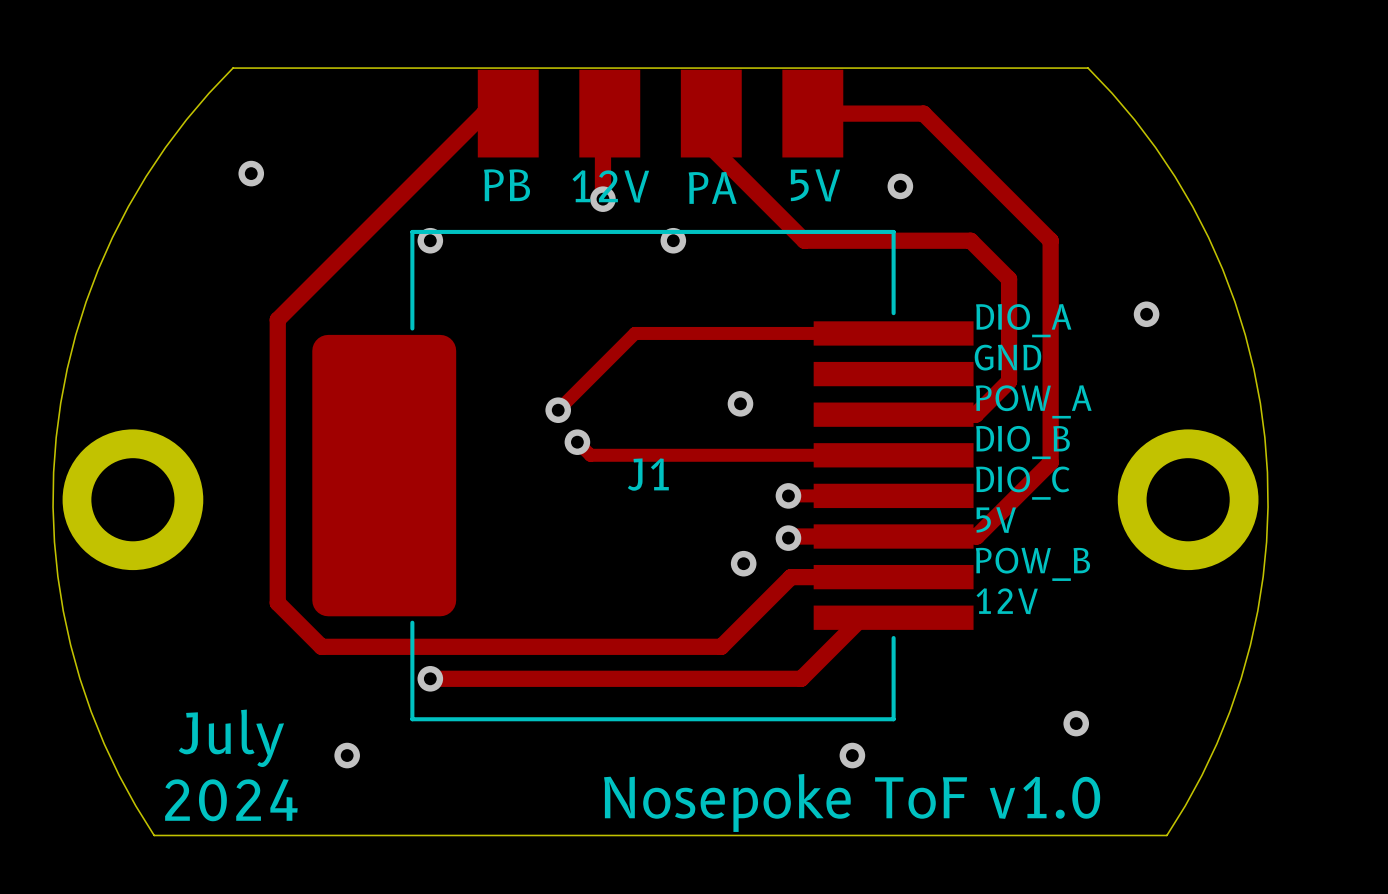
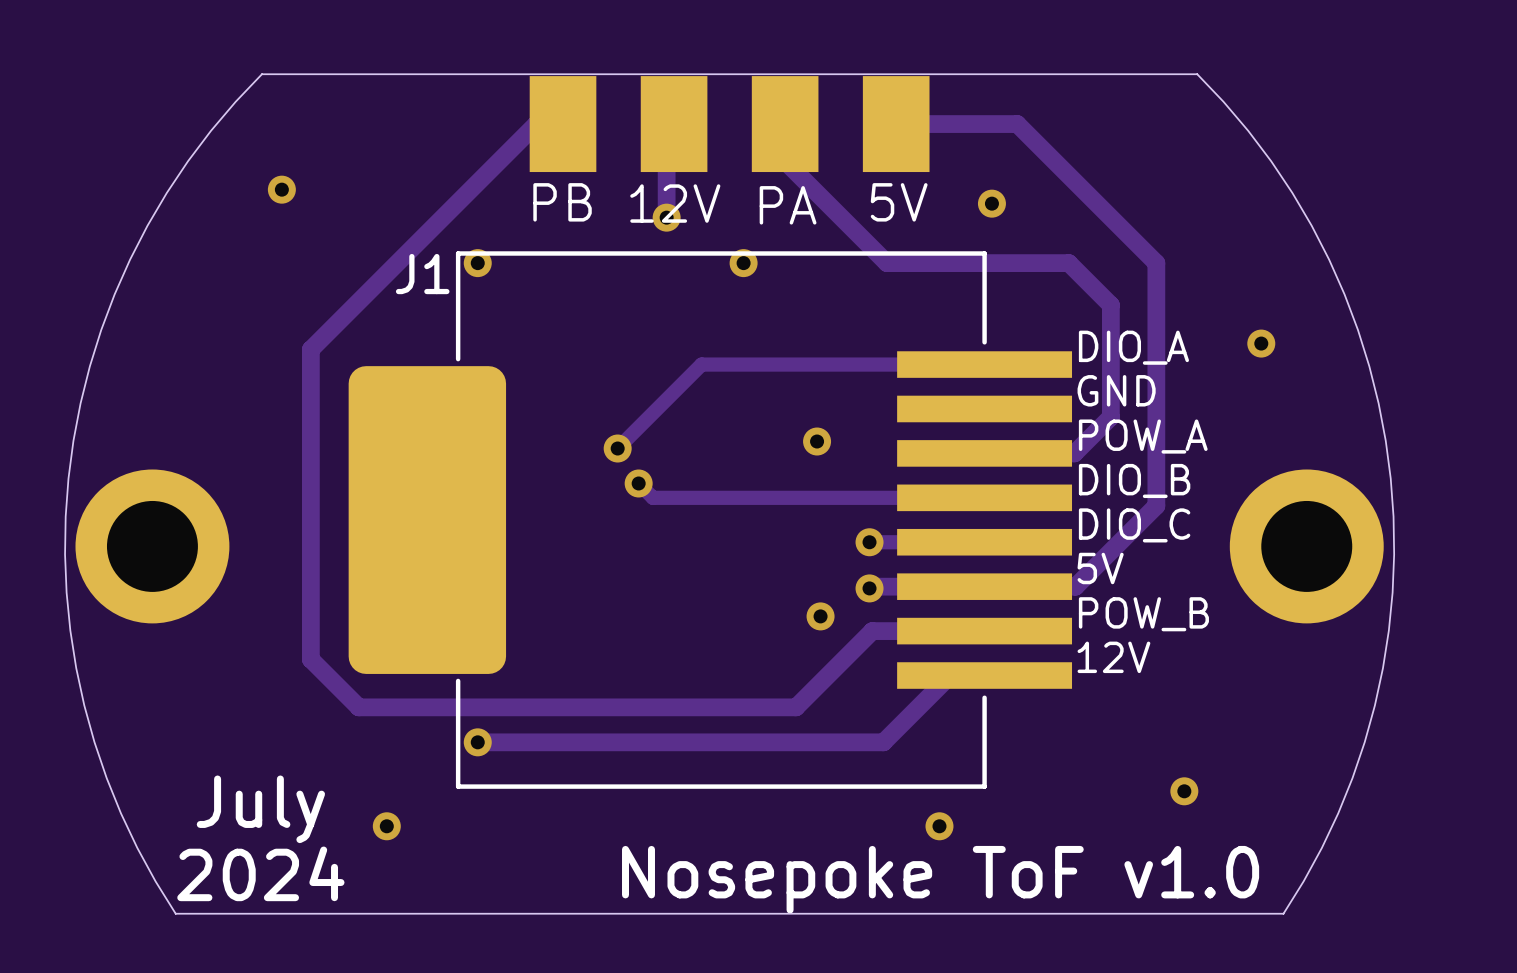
J1 name position: J1 (648, 474) -> J1 (422, 274)

